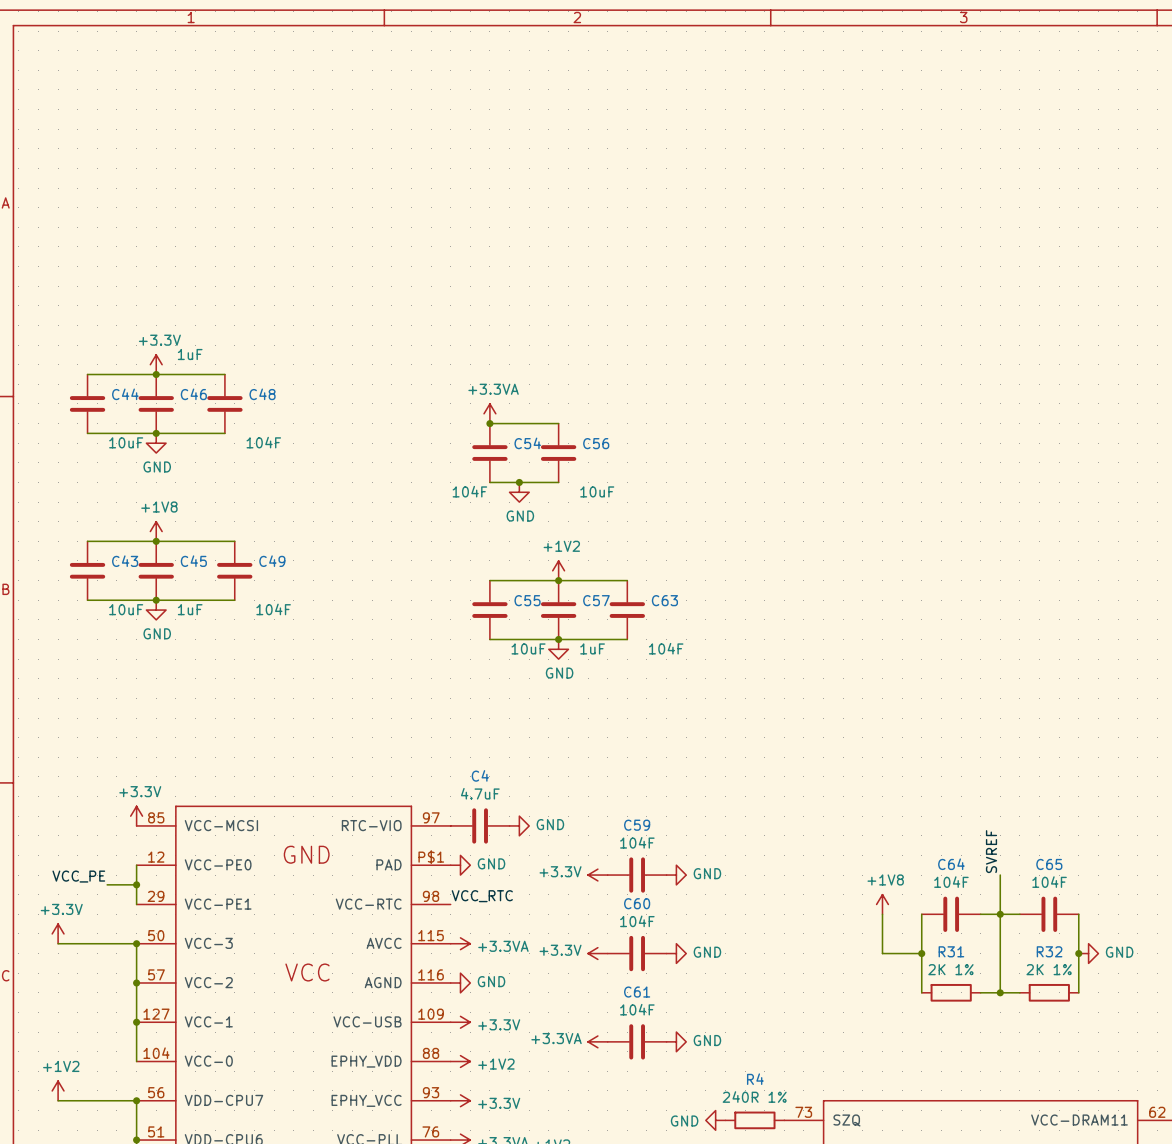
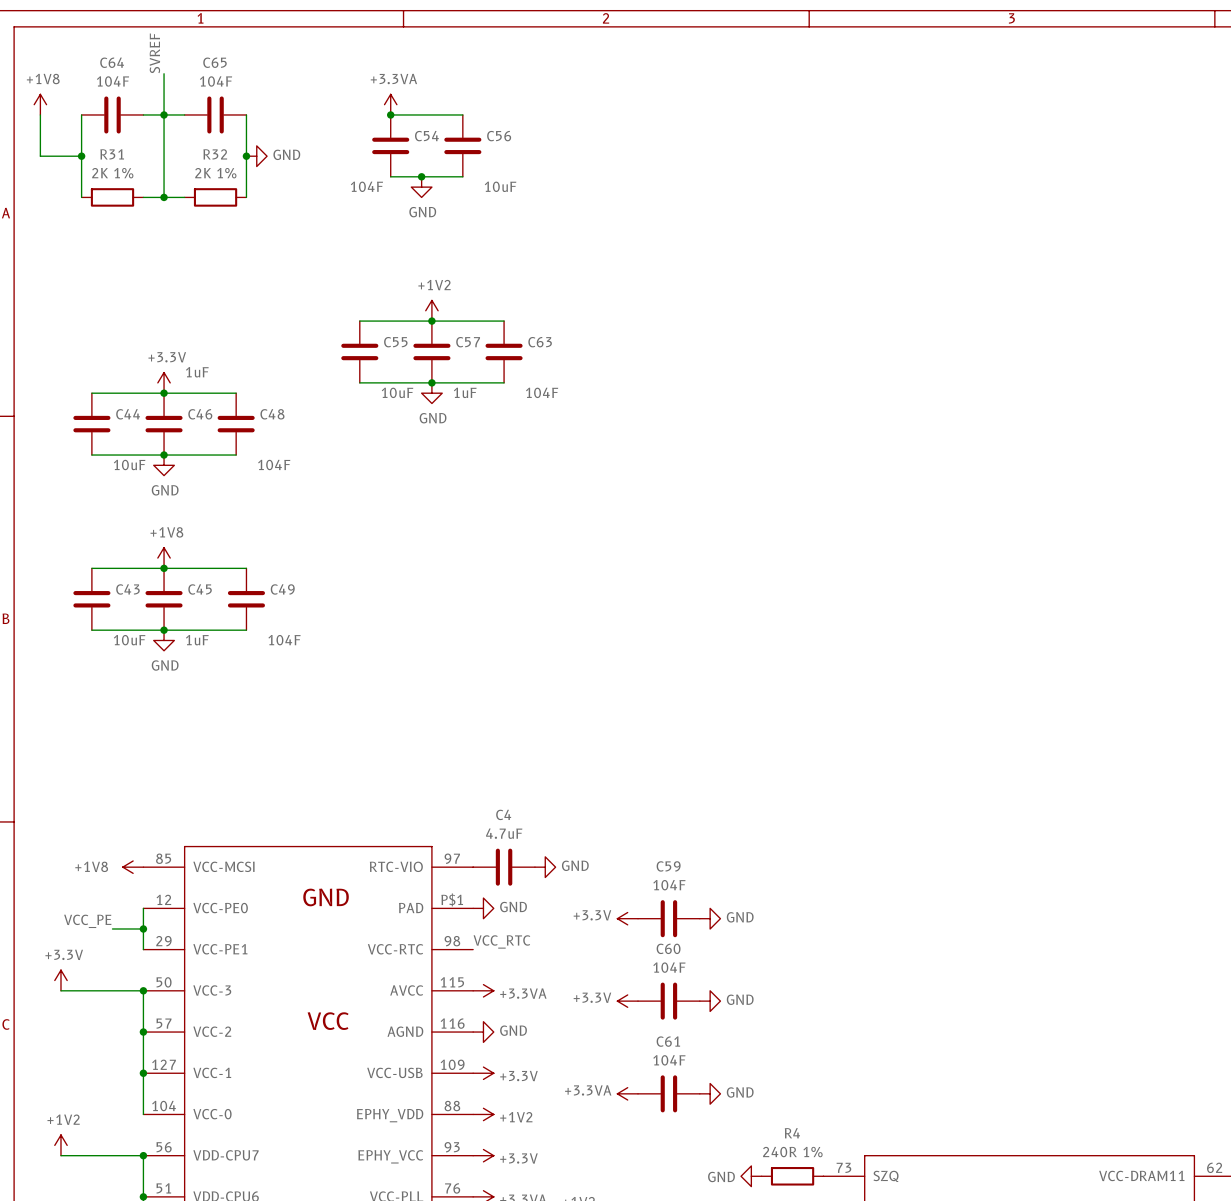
label: none -> SVREF (154, 53)
wire: none -> (164, 73) (164, 197)
power symbol: none -> +1V8 (40, 104)
power symbol: none -> +3.3VA (390, 104)
wire: none -> (40, 114) (40, 156) (81, 156)
wire: none -> (81, 114) (81, 197)
wire: none -> (143, 114) (184, 114)
junction: none -> (164, 114)
wire: none -> (246, 114) (246, 197)
wire: none -> (390, 114) (462, 114)
junction: none -> (390, 114)
junction: none -> (81, 156)
junction: none -> (246, 156)
power symbol: none -> GND (256, 156)
wire: none -> (390, 176) (462, 176)
junction: none -> (421, 176)
power symbol: none -> GND (421, 187)
wire: none -> (143, 197) (184, 197)
junction: none -> (164, 197)
power symbol: none -> +1V2 (431, 310)
wire: none -> (359, 321) (504, 321)
junction: none -> (431, 321)
wire: none -> (359, 382) (504, 382)
junction: none -> (431, 382)
power symbol: none -> GND (431, 393)
power symbol: +3.3VA (489, 413) -> none
wire: (489, 423) (558, 423) -> none
junction: (489, 423) -> none
C54 position: (489, 453) -> (390, 145)
C56 position: (558, 453) -> (462, 145)
wire: (489, 482) (558, 482) -> none
junction: (519, 482) -> none
power symbol: GND (519, 492) -> none
power symbol: +1V2 (558, 570) -> none
wire: (489, 580) (627, 580) -> none
junction: (558, 580) -> none
C55 position: (489, 610) -> (359, 351)
C57 position: (558, 610) -> (431, 351)
C63 position: (627, 610) -> (504, 351)
wire: (489, 639) (627, 639) -> none
junction: (558, 639) -> none
power symbol: GND (558, 649) -> none
power symbol: +3.3V (136, 816) -> none
power symbol: none -> +1V8 (133, 867)
label: SVREF (991, 851) -> none
wire: (1000, 875) (1000, 992) -> none
power symbol: +1V8 (882, 904) -> none
wire: (882, 914) (882, 953) (921, 953) -> none
wire: (921, 914) (921, 992) -> none
C64 position: (951, 914) -> (112, 114)
wire: (980, 914) (1019, 914) -> none
junction: (1000, 914) -> none
C65 position: (1049, 914) -> (215, 114)
wire: (1078, 914) (1078, 992) -> none
junction: (921, 953) -> none
junction: (1078, 953) -> none
power symbol: GND (1088, 953) -> none
R31 position: (951, 992) -> (112, 197)
wire: (980, 992) (1019, 992) -> none
junction: (1000, 992) -> none
R32 position: (1049, 992) -> (215, 197)

